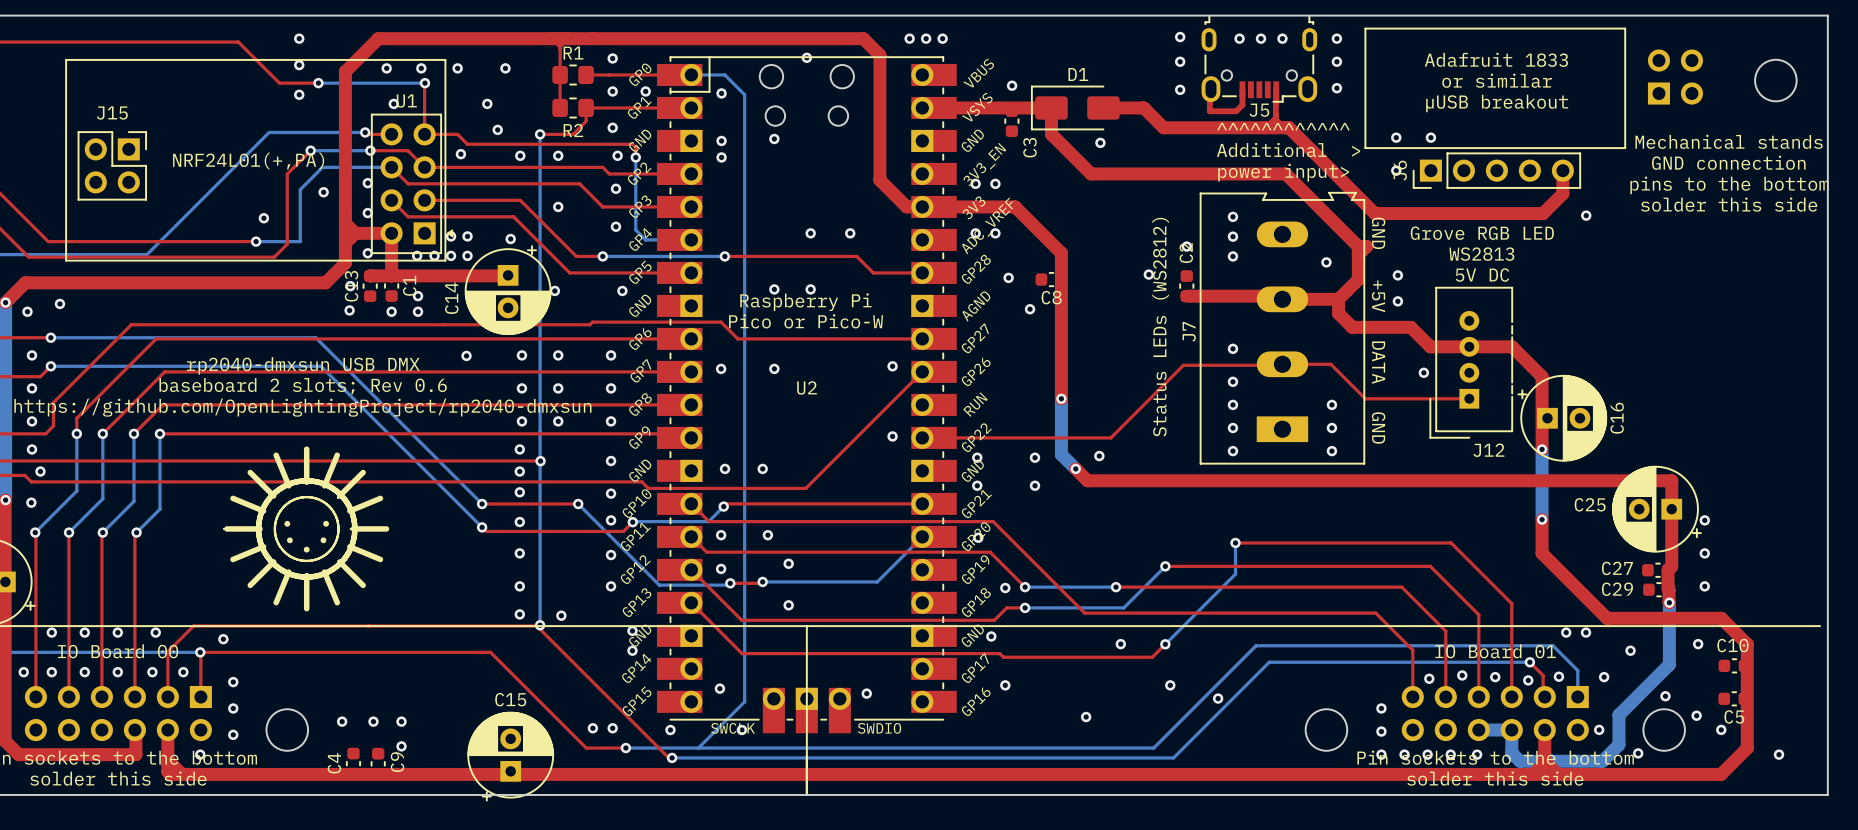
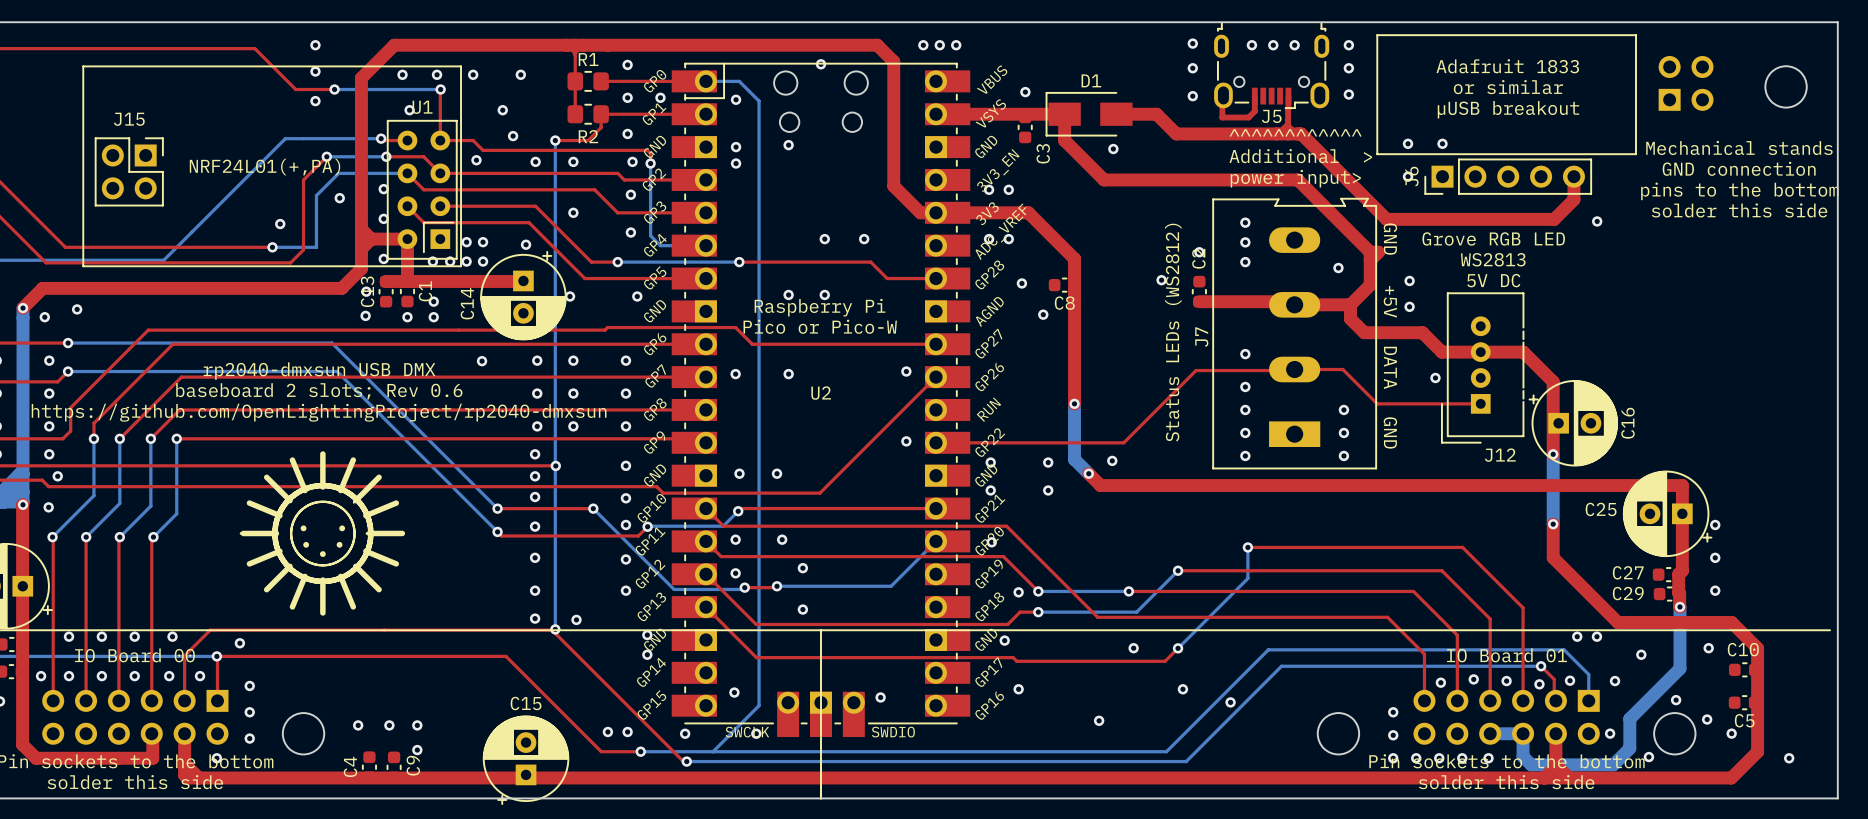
U1 footprint: [65, 59, 454, 262] -> [82, 65, 462, 268]
D1 footprint: [1031, 85, 1120, 131] -> [1045, 92, 1133, 137]

